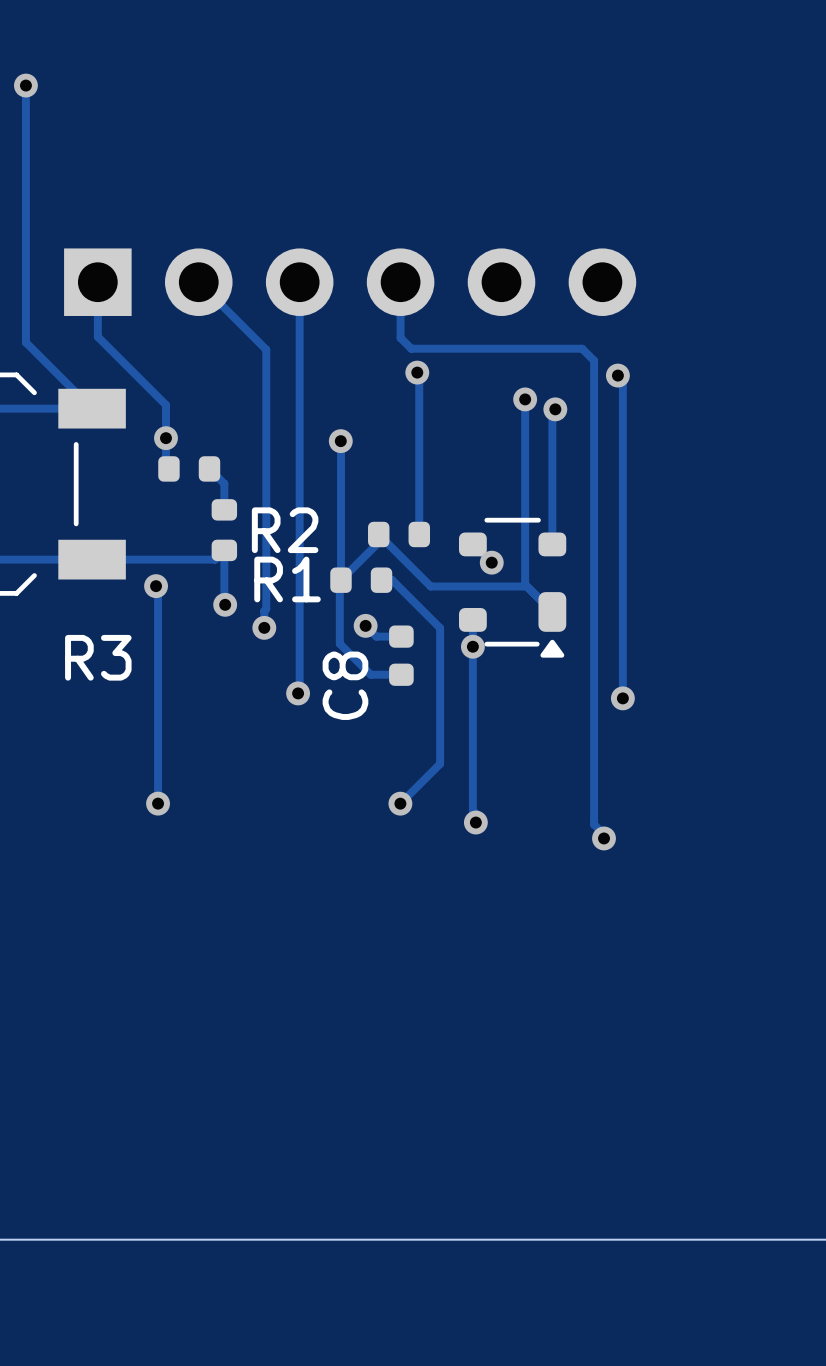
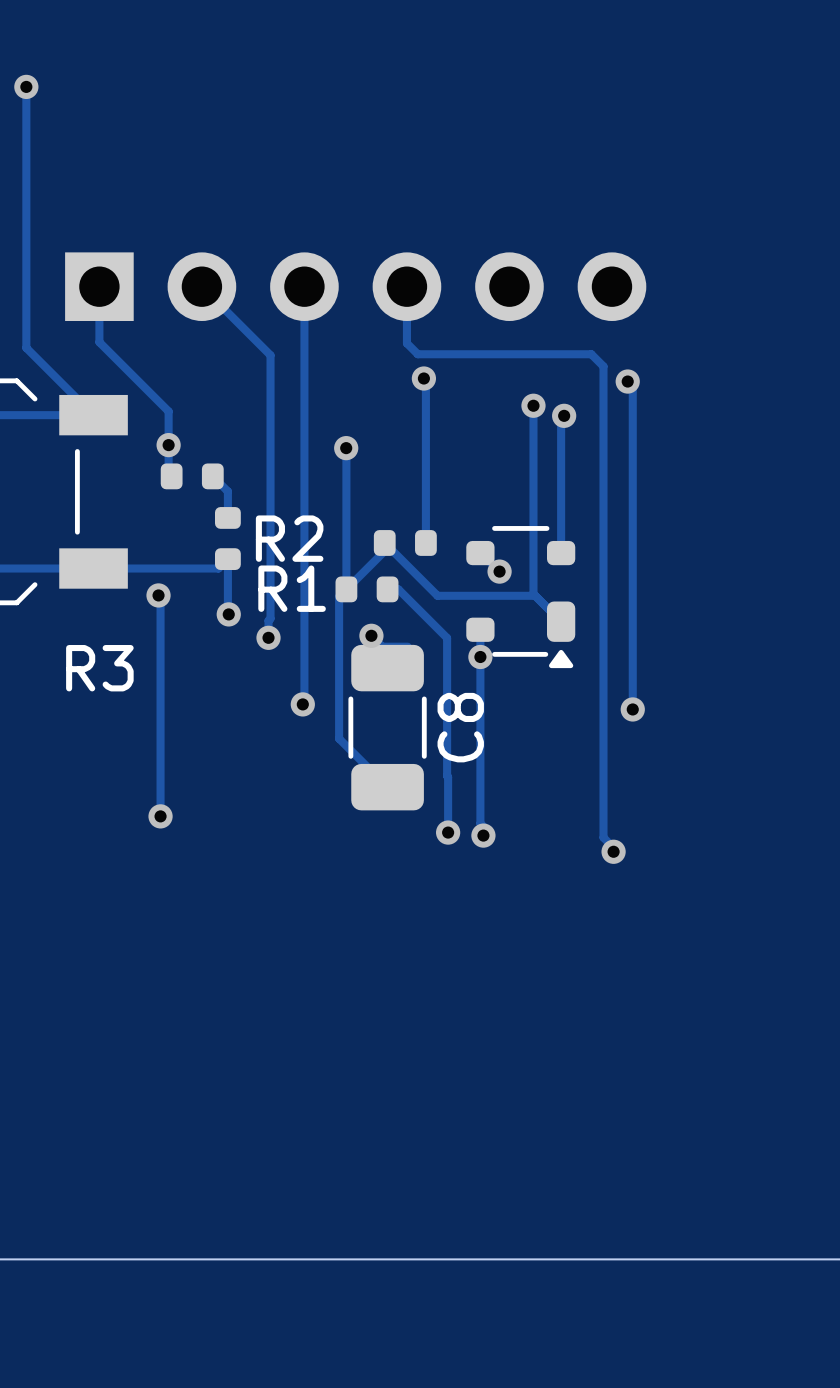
track: (339, 581) (339, 643) (370, 674) -> (345, 590) (339, 596) (339, 738) (387, 787)
C8 footprint: [389, 625, 414, 686] -> [348, 644, 427, 811]
C8 name position: C8 (345, 685) -> C8 (460, 727)
track: (440, 763) (400, 803) -> (447, 776) (448, 832)
via position: (400, 803) -> (448, 832)

